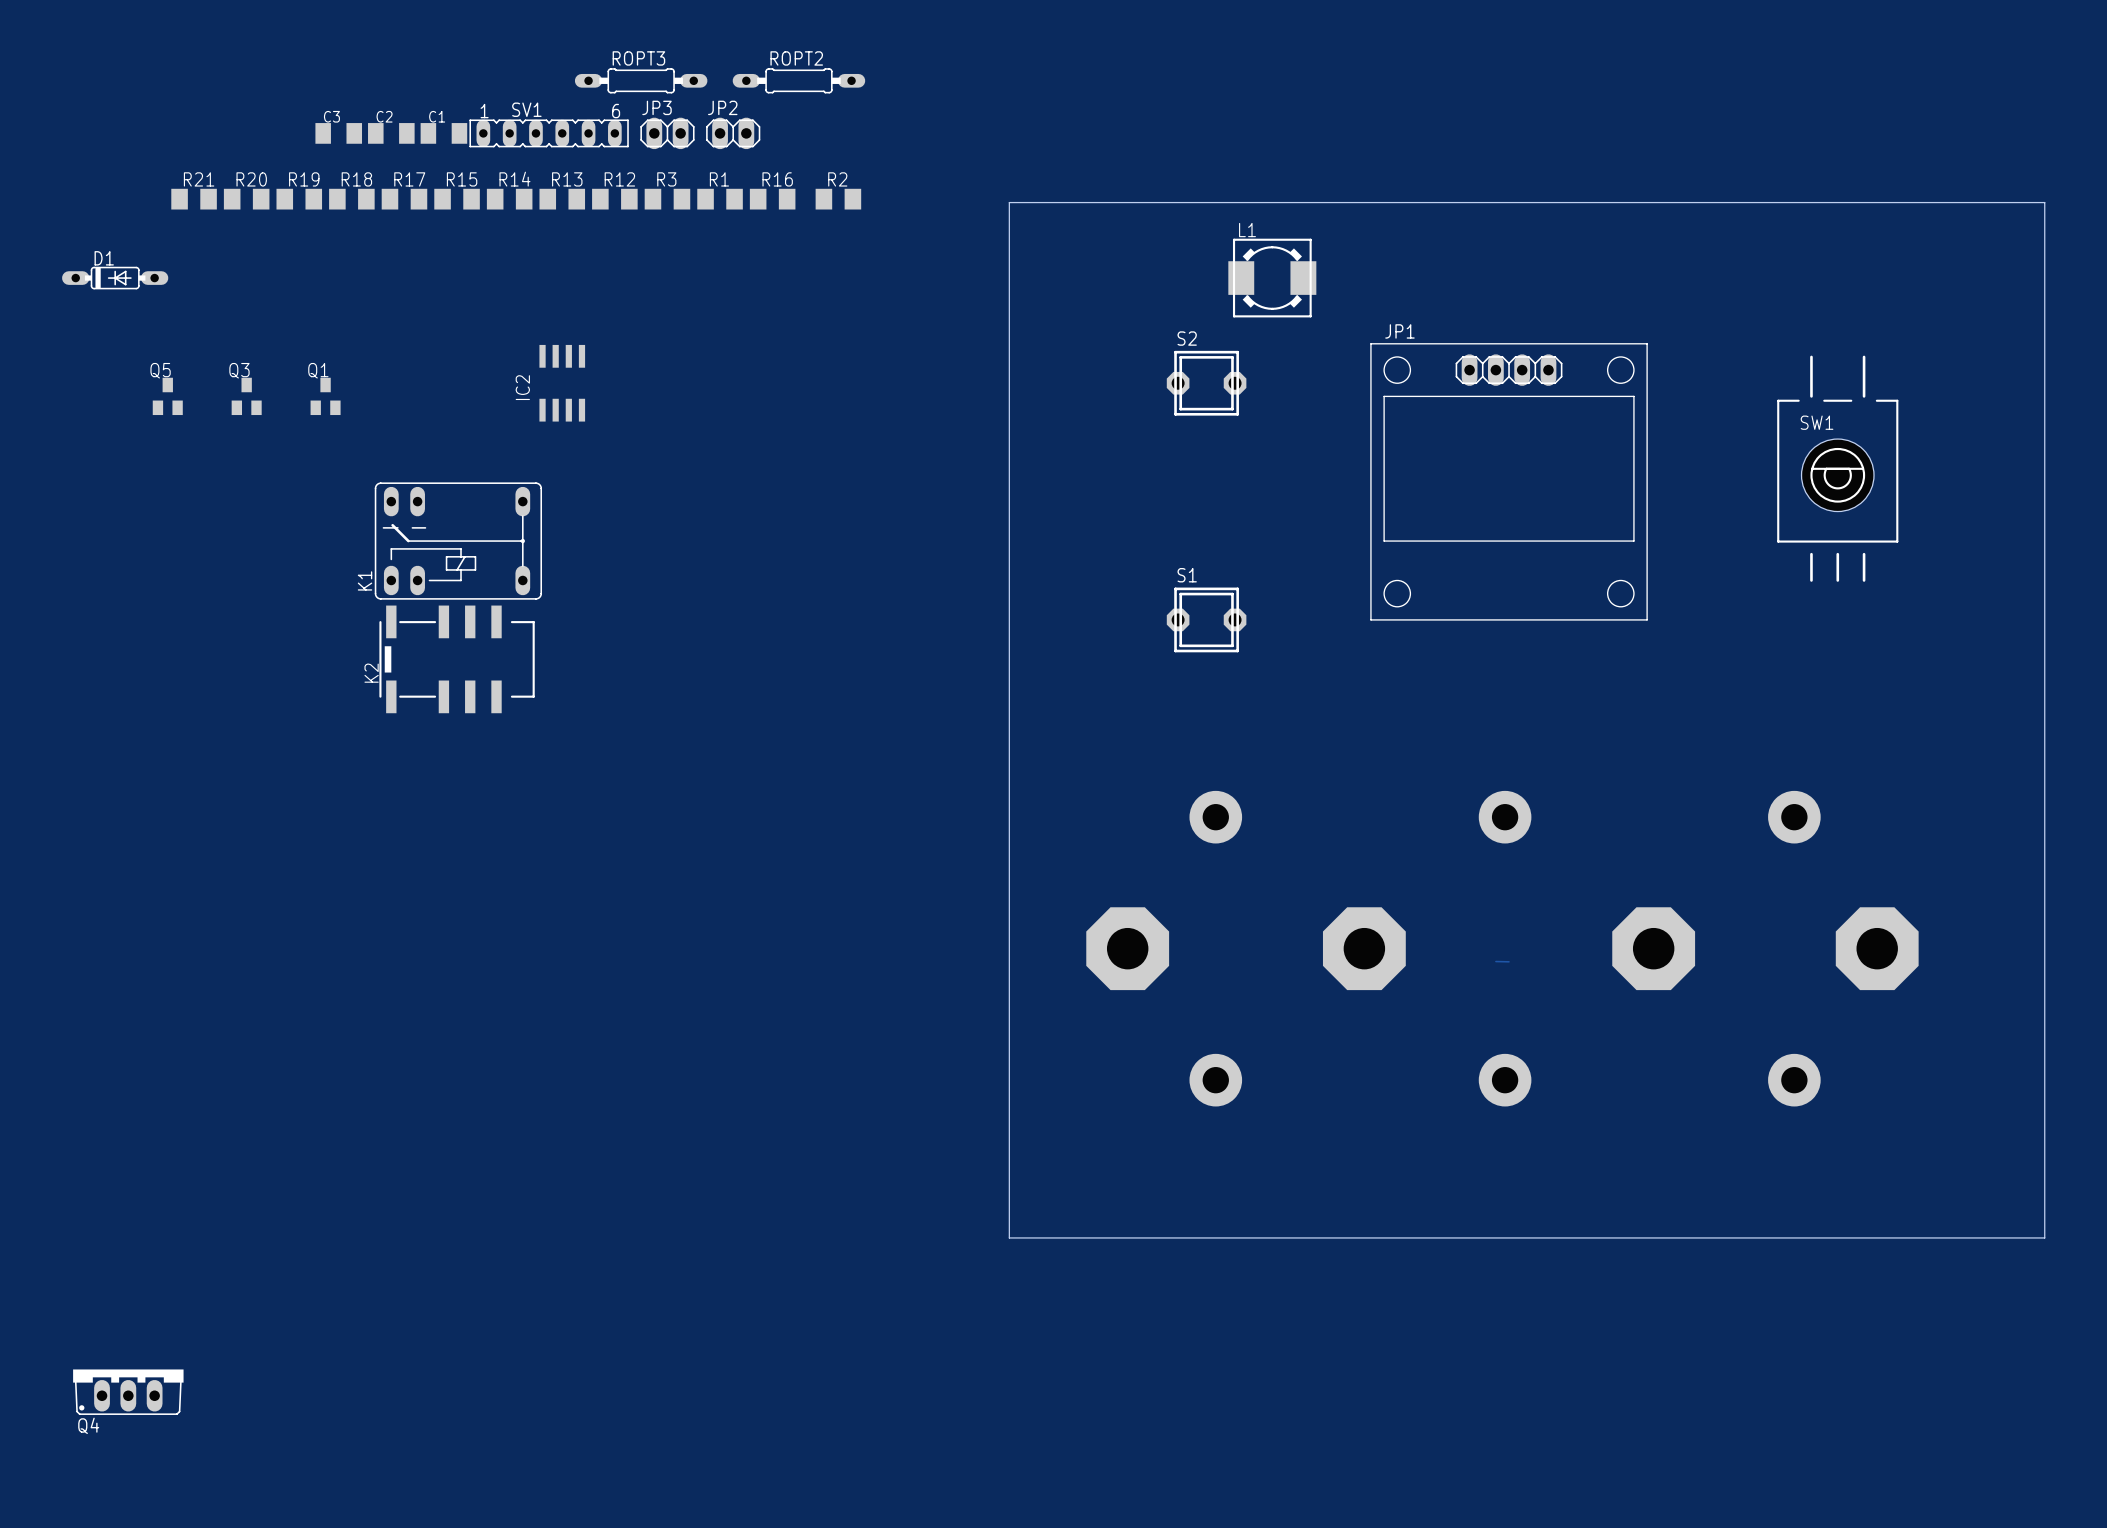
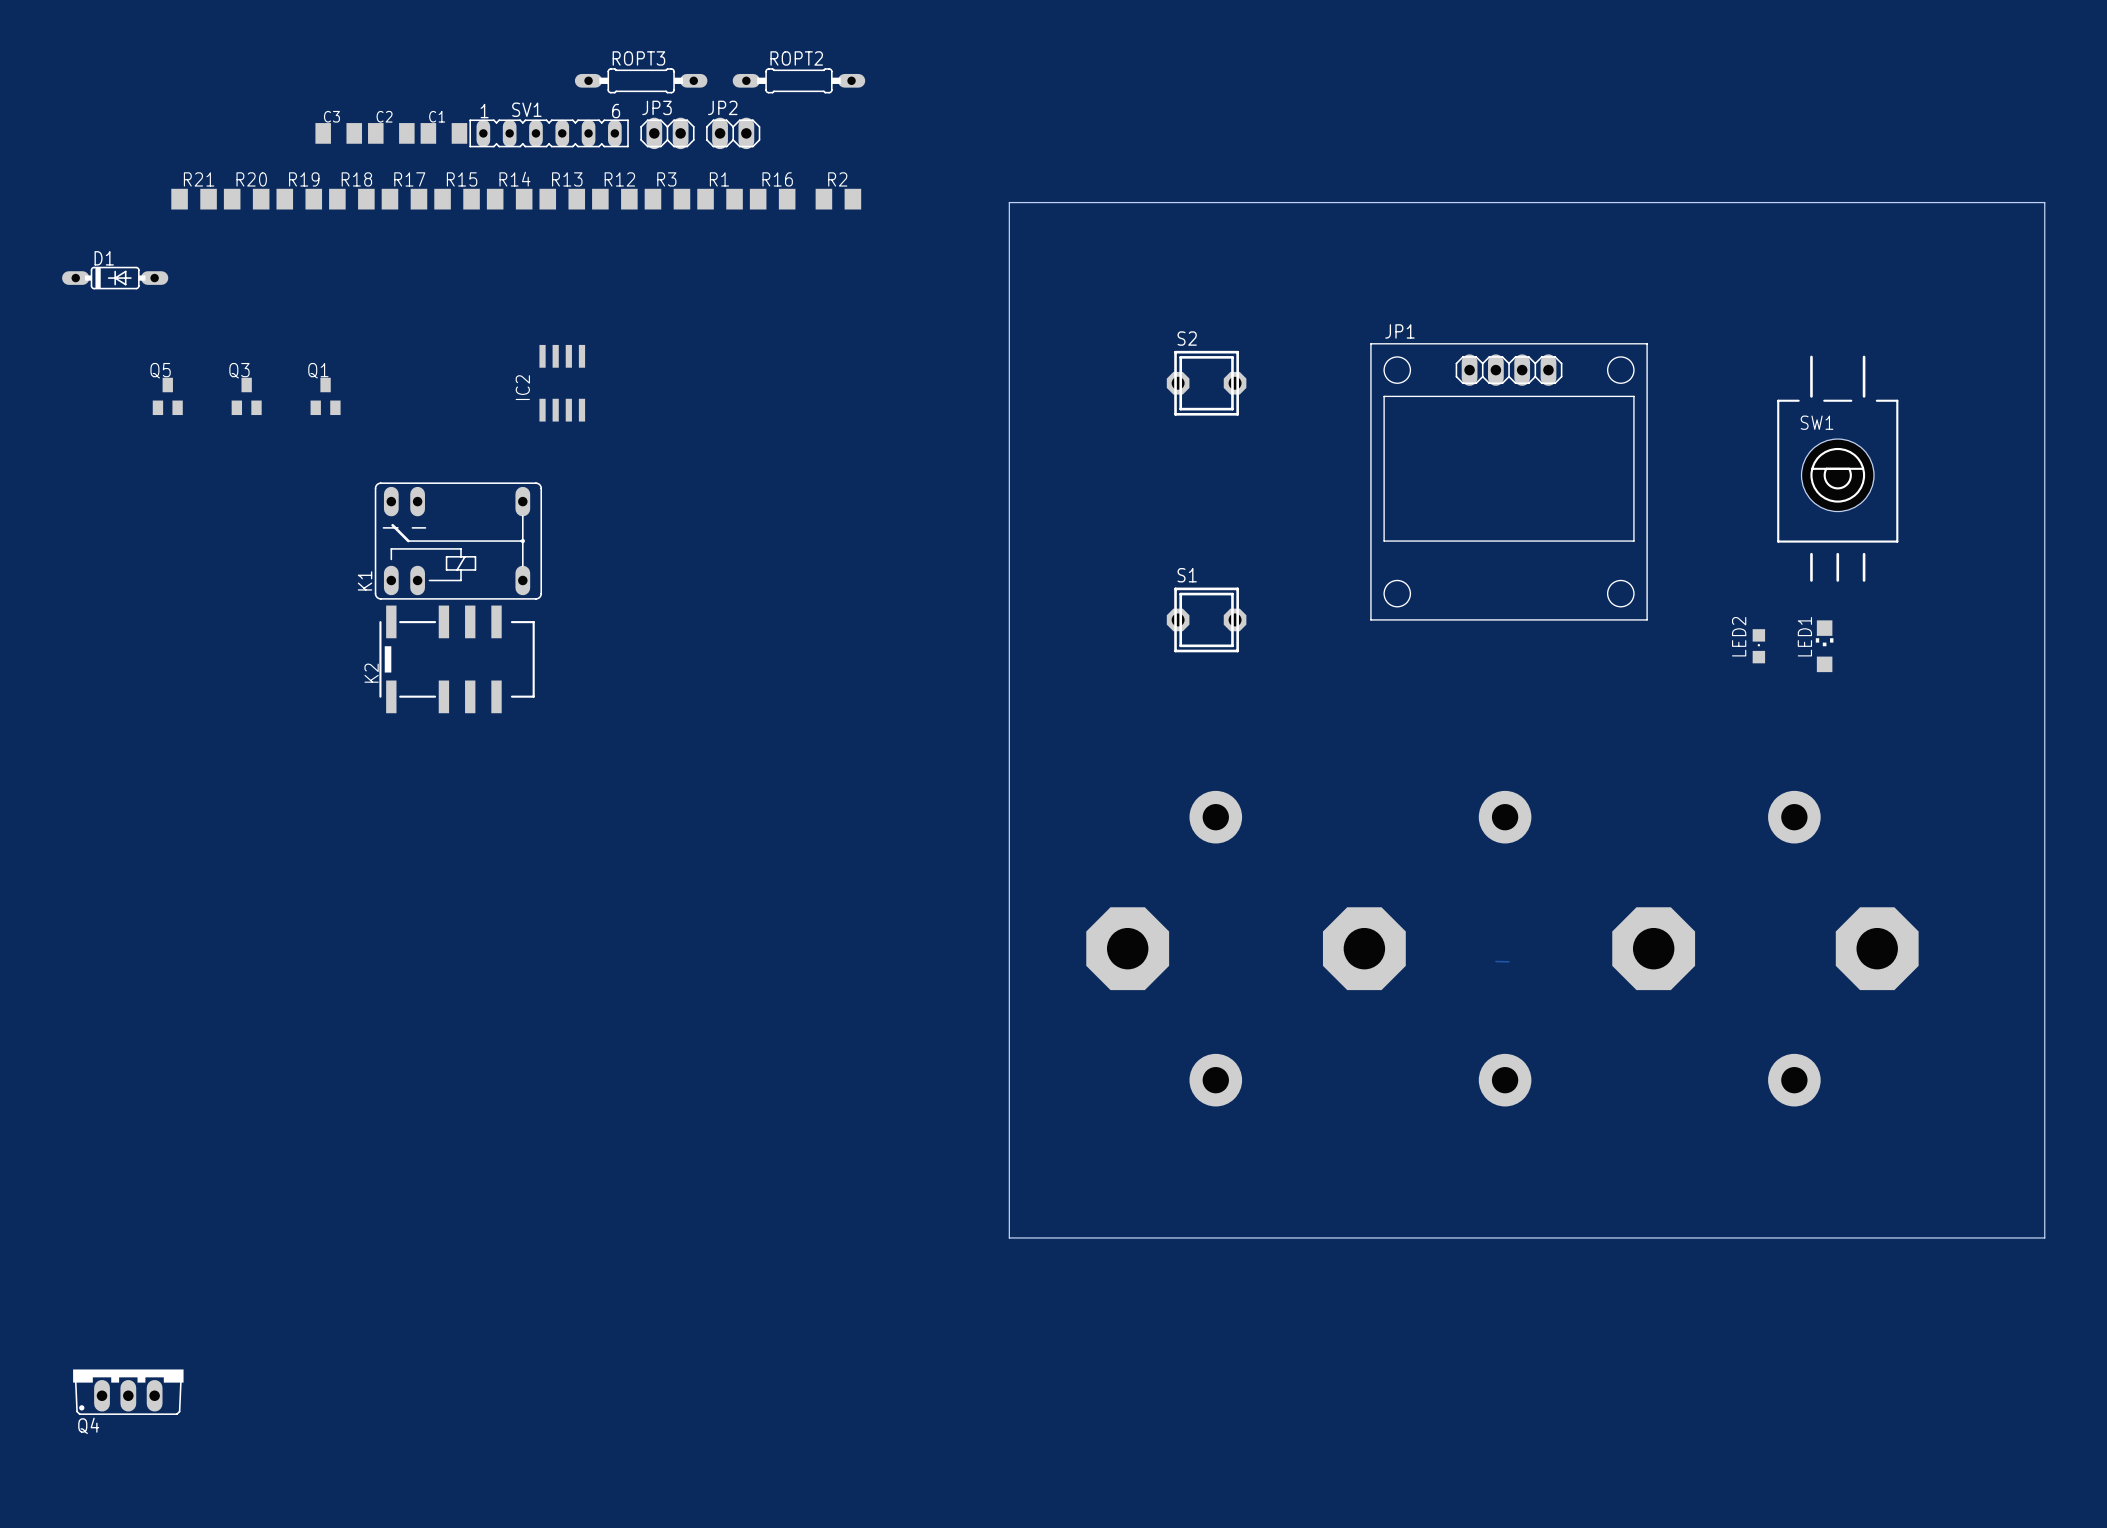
L1: (1272, 278) -> none
LED2: none -> (1758, 646)
LED1: none -> (1824, 646)

